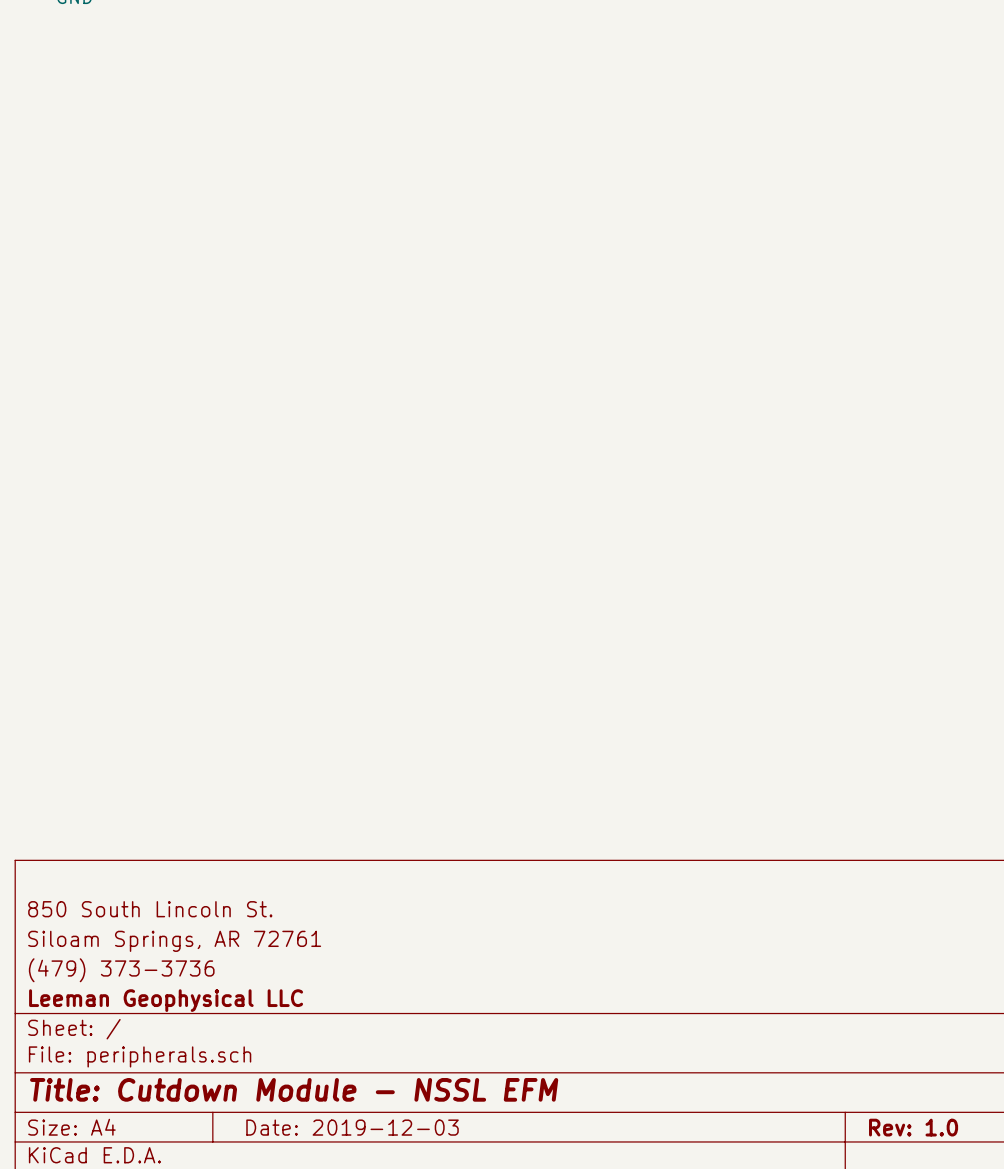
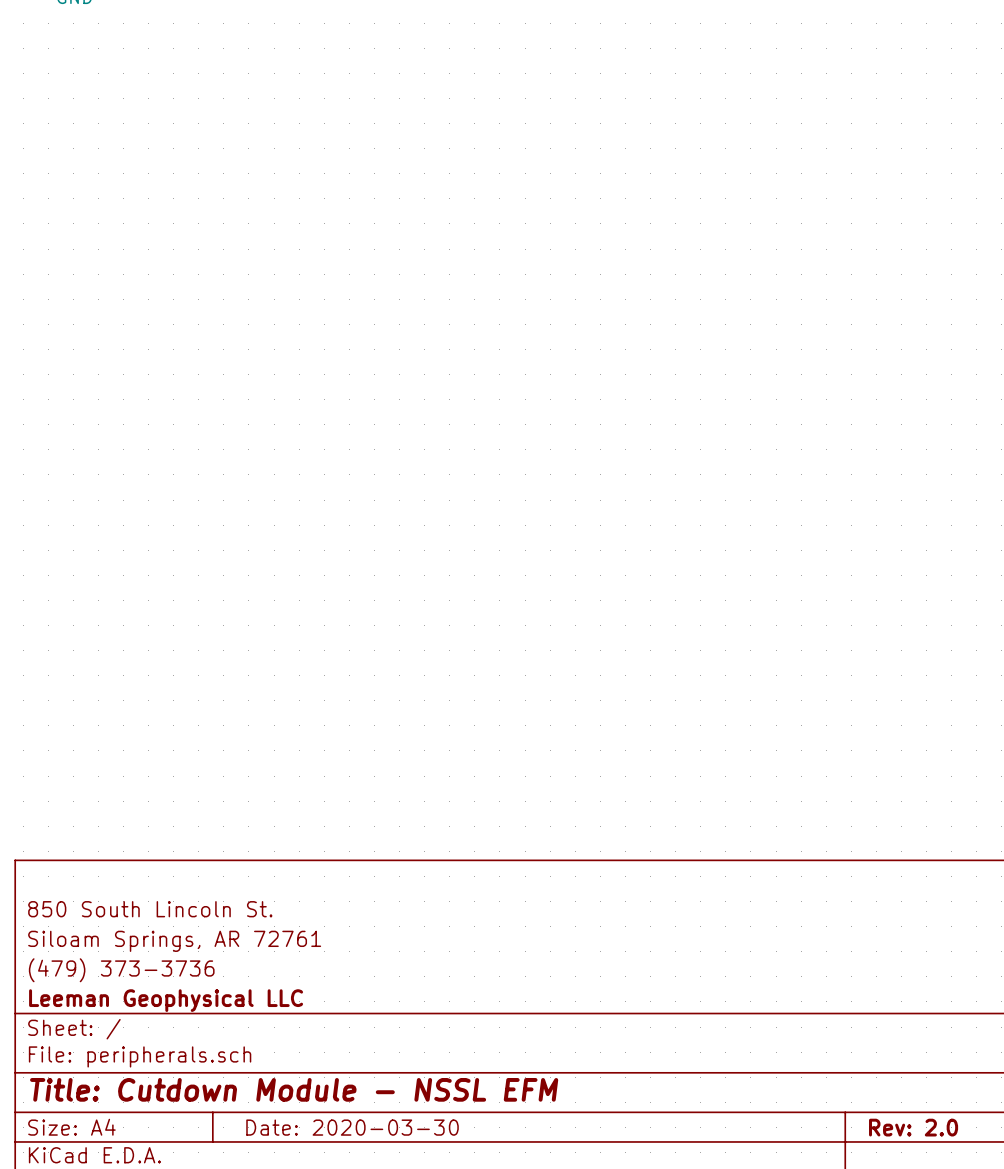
title block: Date: 2019-12-03 (352, 1127) -> Date: 2020-03-30 (352, 1127)
title block: Rev: 1.0 (913, 1127) -> Rev: 2.0 (913, 1127)

